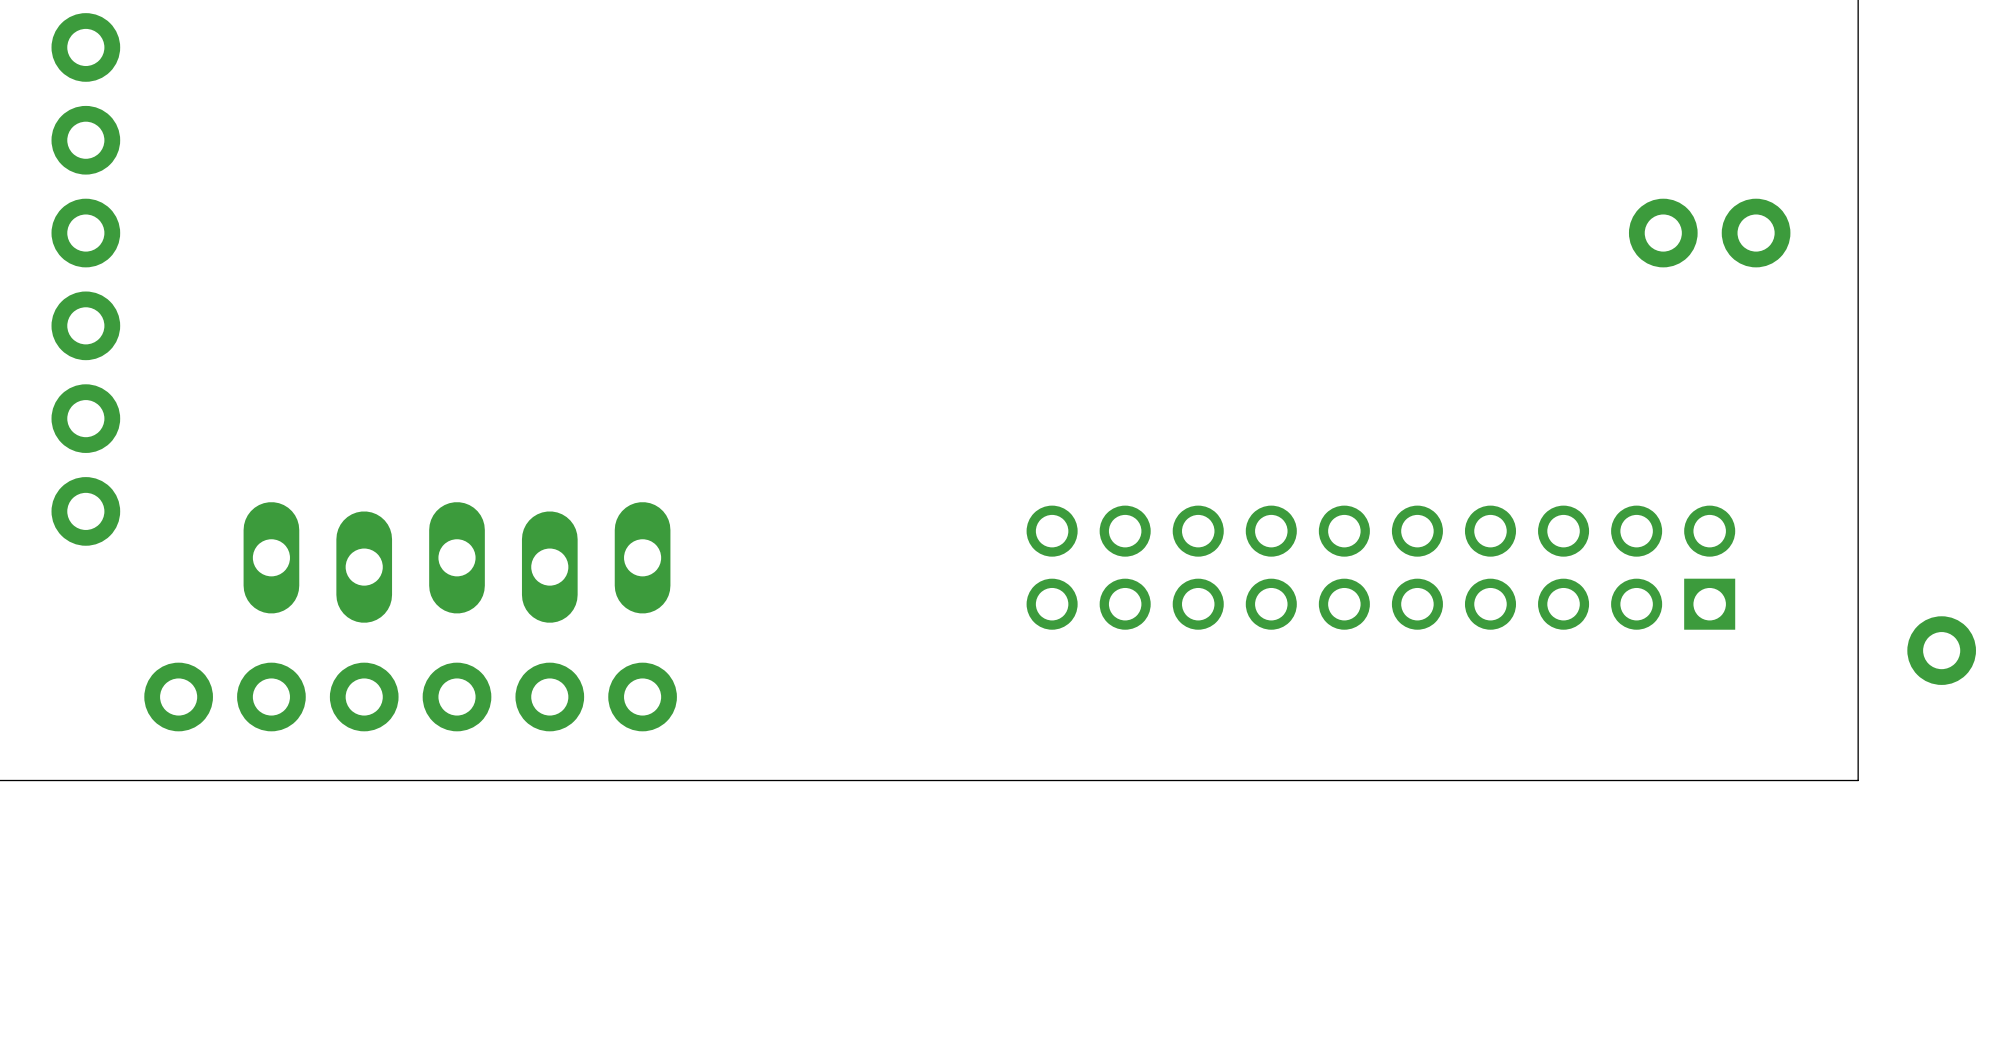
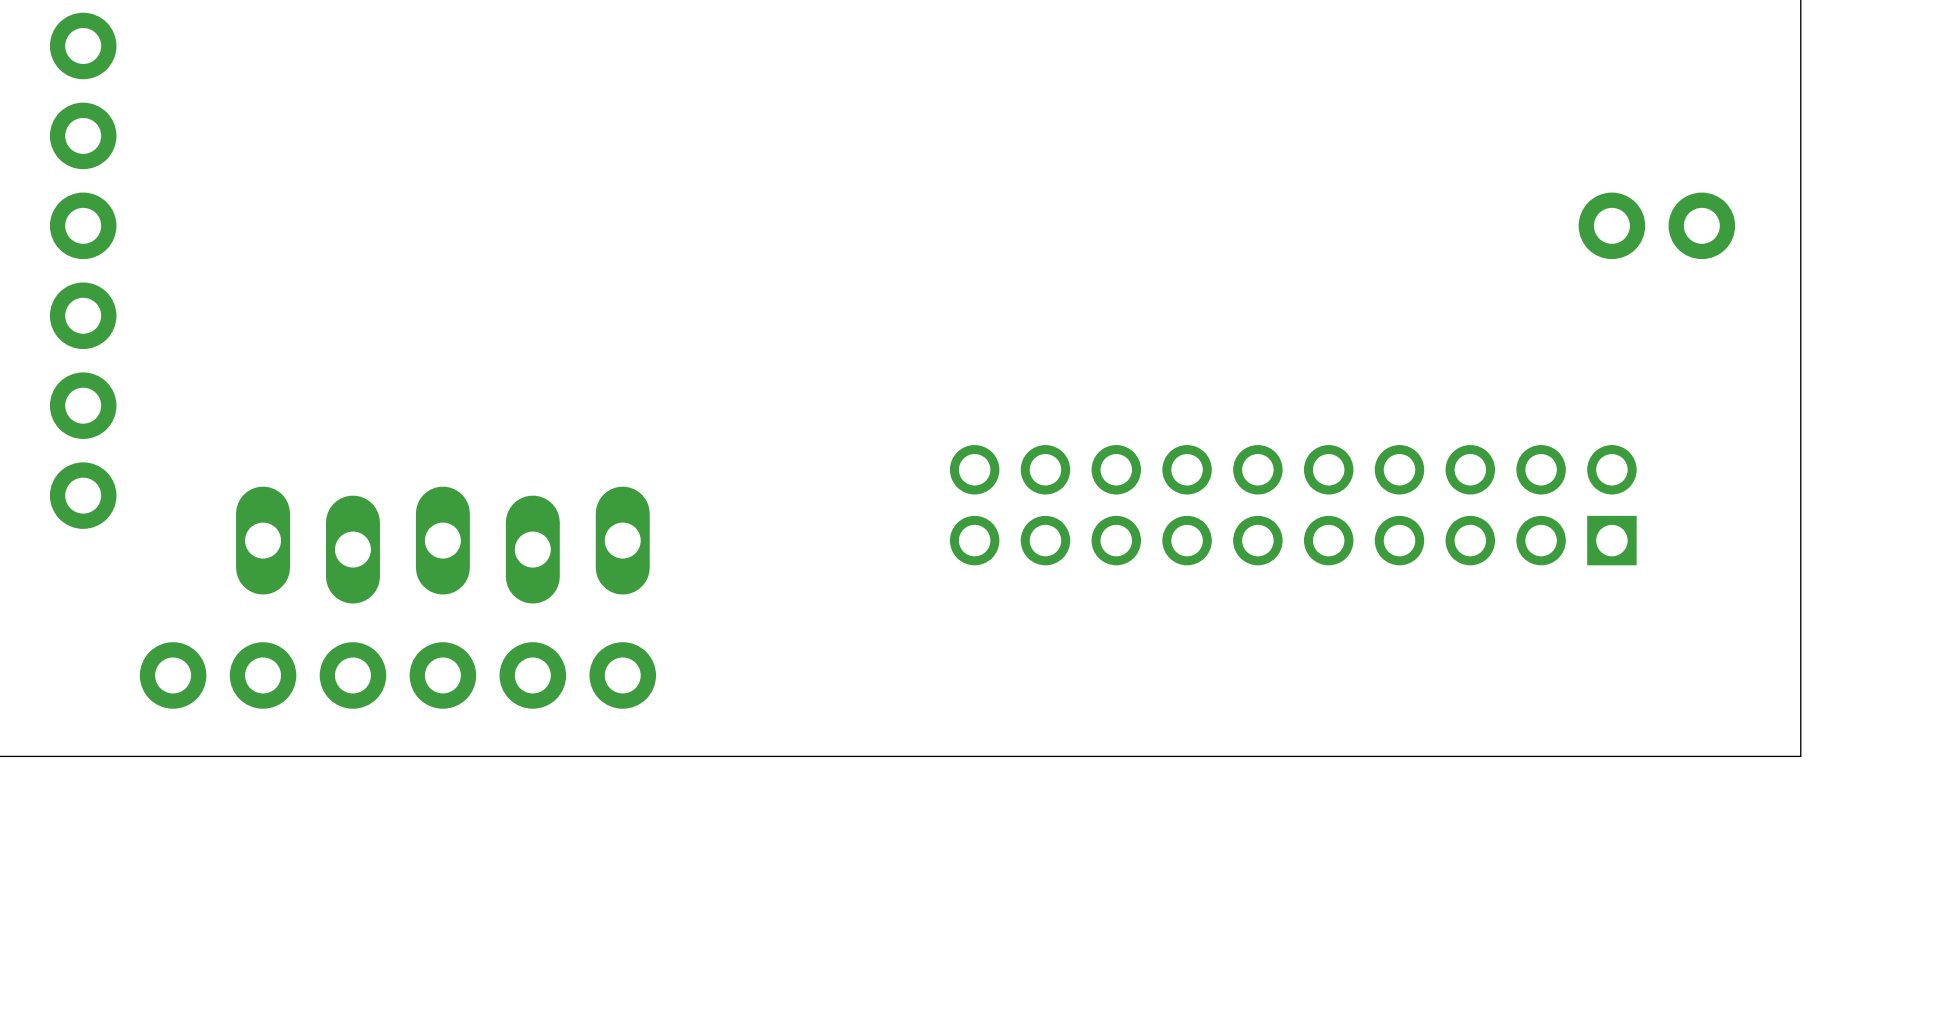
part position: (1380, 567) -> (1293, 505)
part: (1941, 650) -> none

